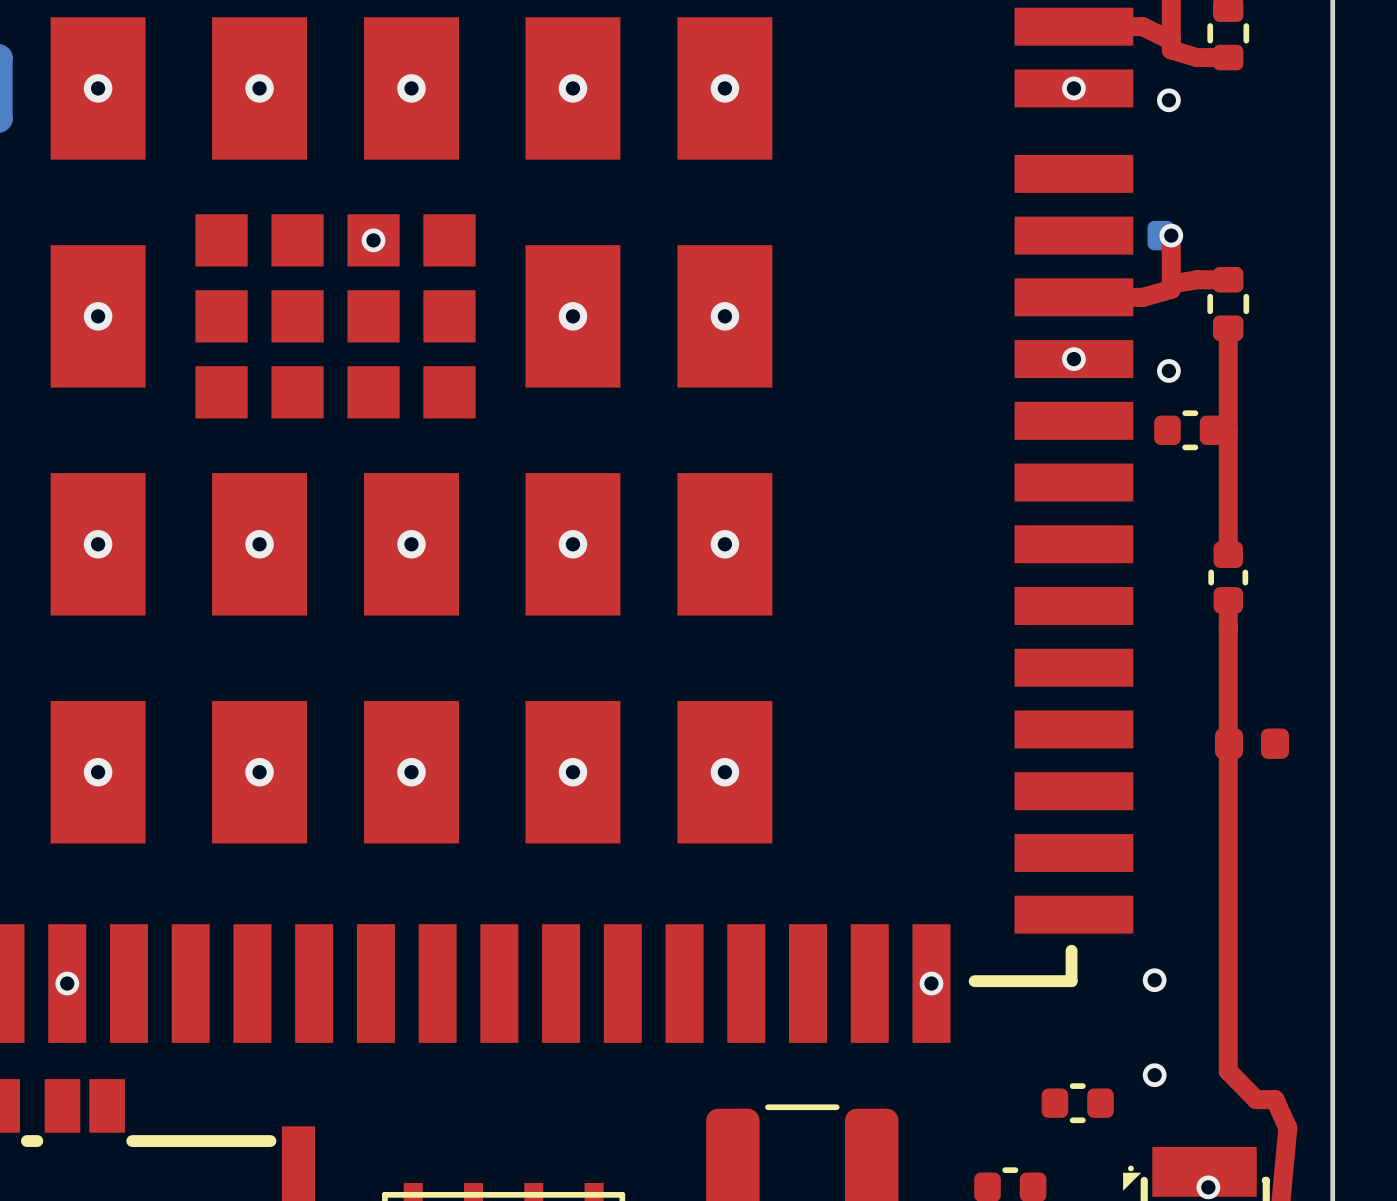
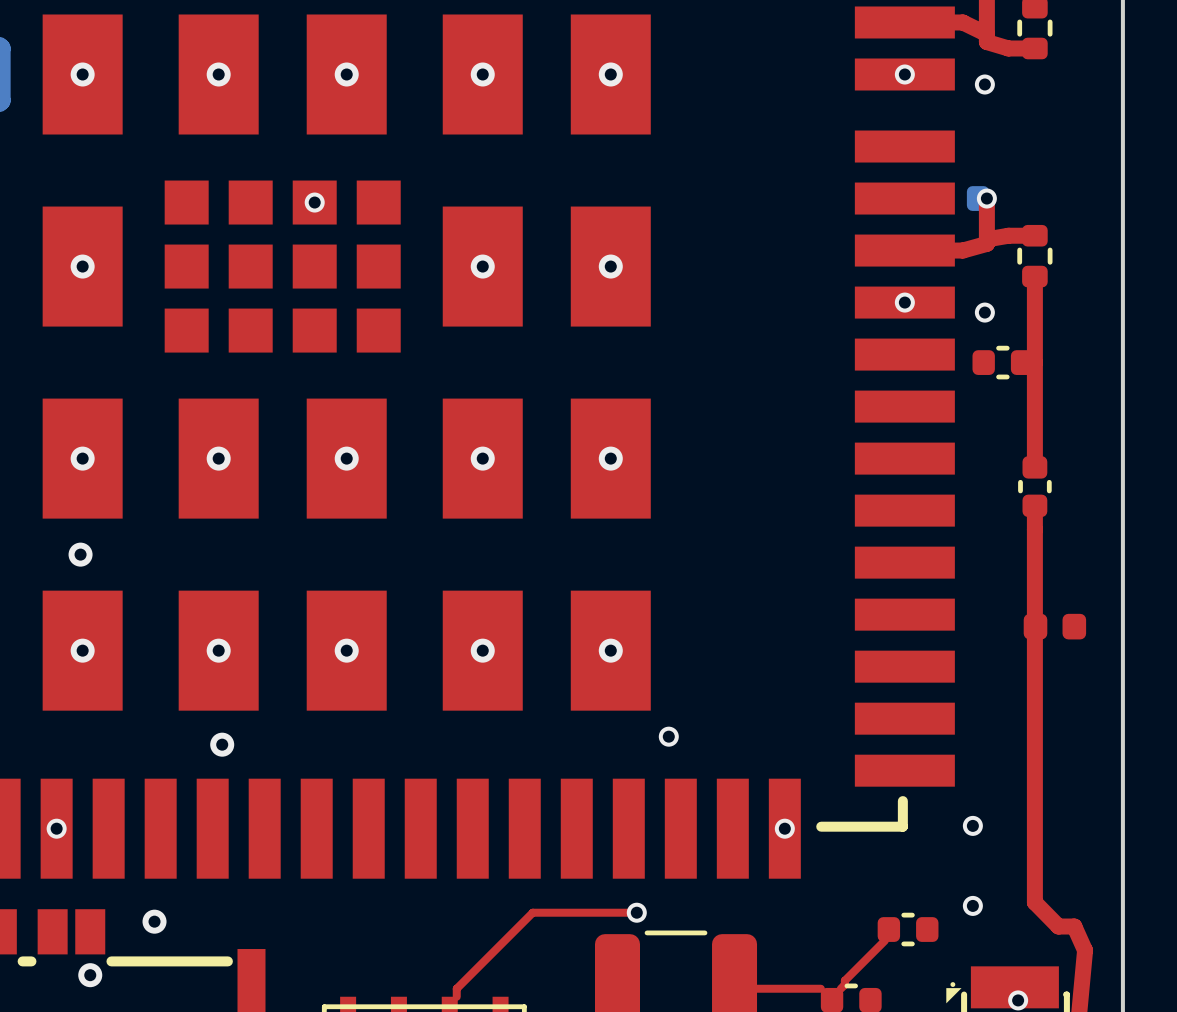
via: none -> (80, 554)
via: none -> (668, 736)
via: none -> (222, 744)
top track: none -> (636, 912) (532, 912) (456, 988) (456, 996)
via: none -> (636, 912)
via: none -> (154, 921)
top track: none -> (884, 940) (844, 980) (844, 984) (840, 988)
via: none -> (90, 975)
top track: none -> (752, 988) (820, 988)

